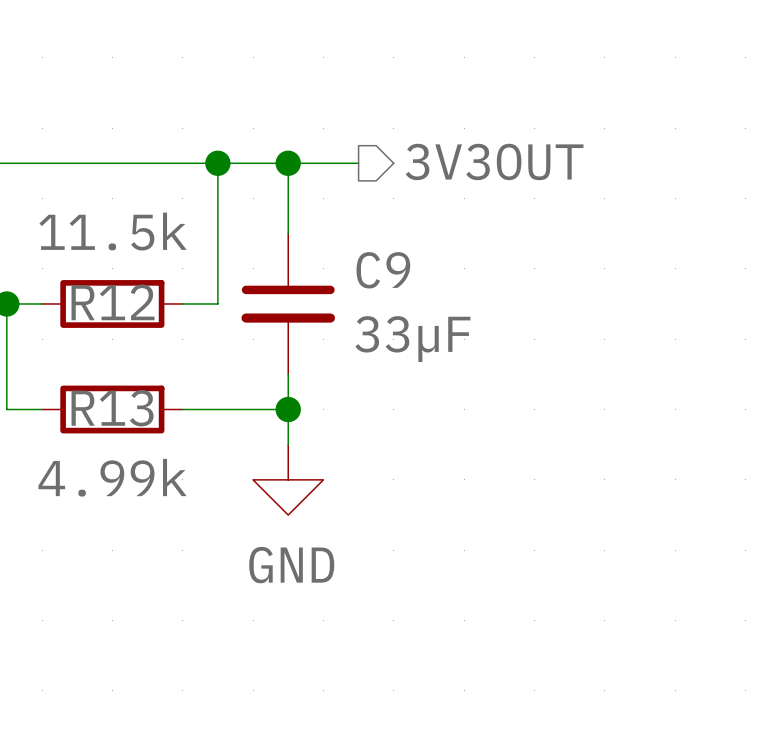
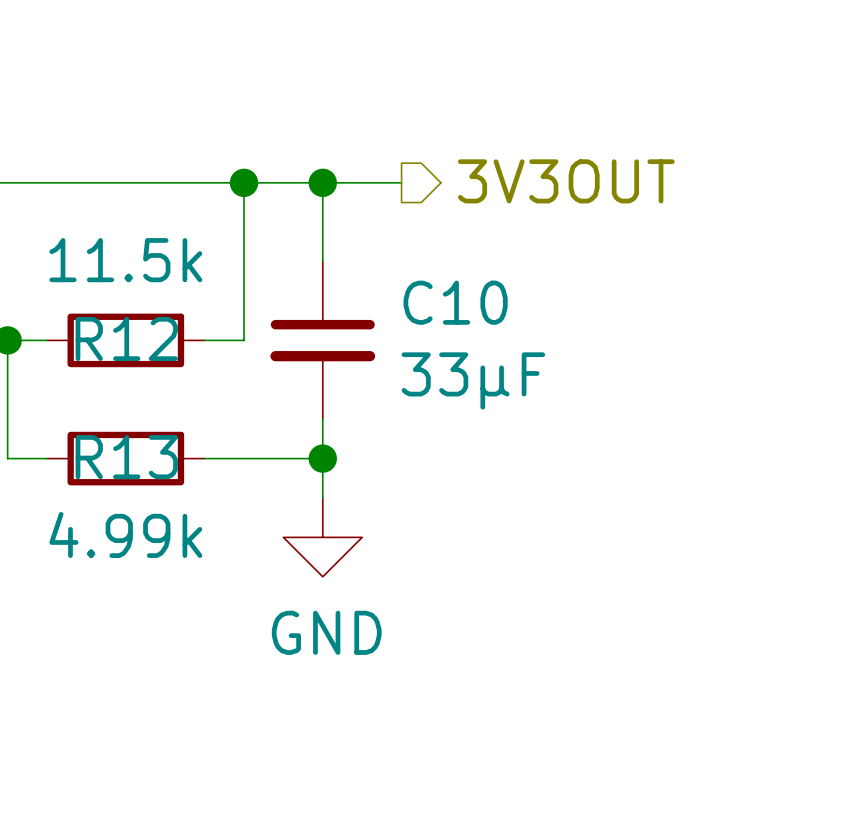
C9 name: C9 (383, 270) -> C10 (455, 302)

